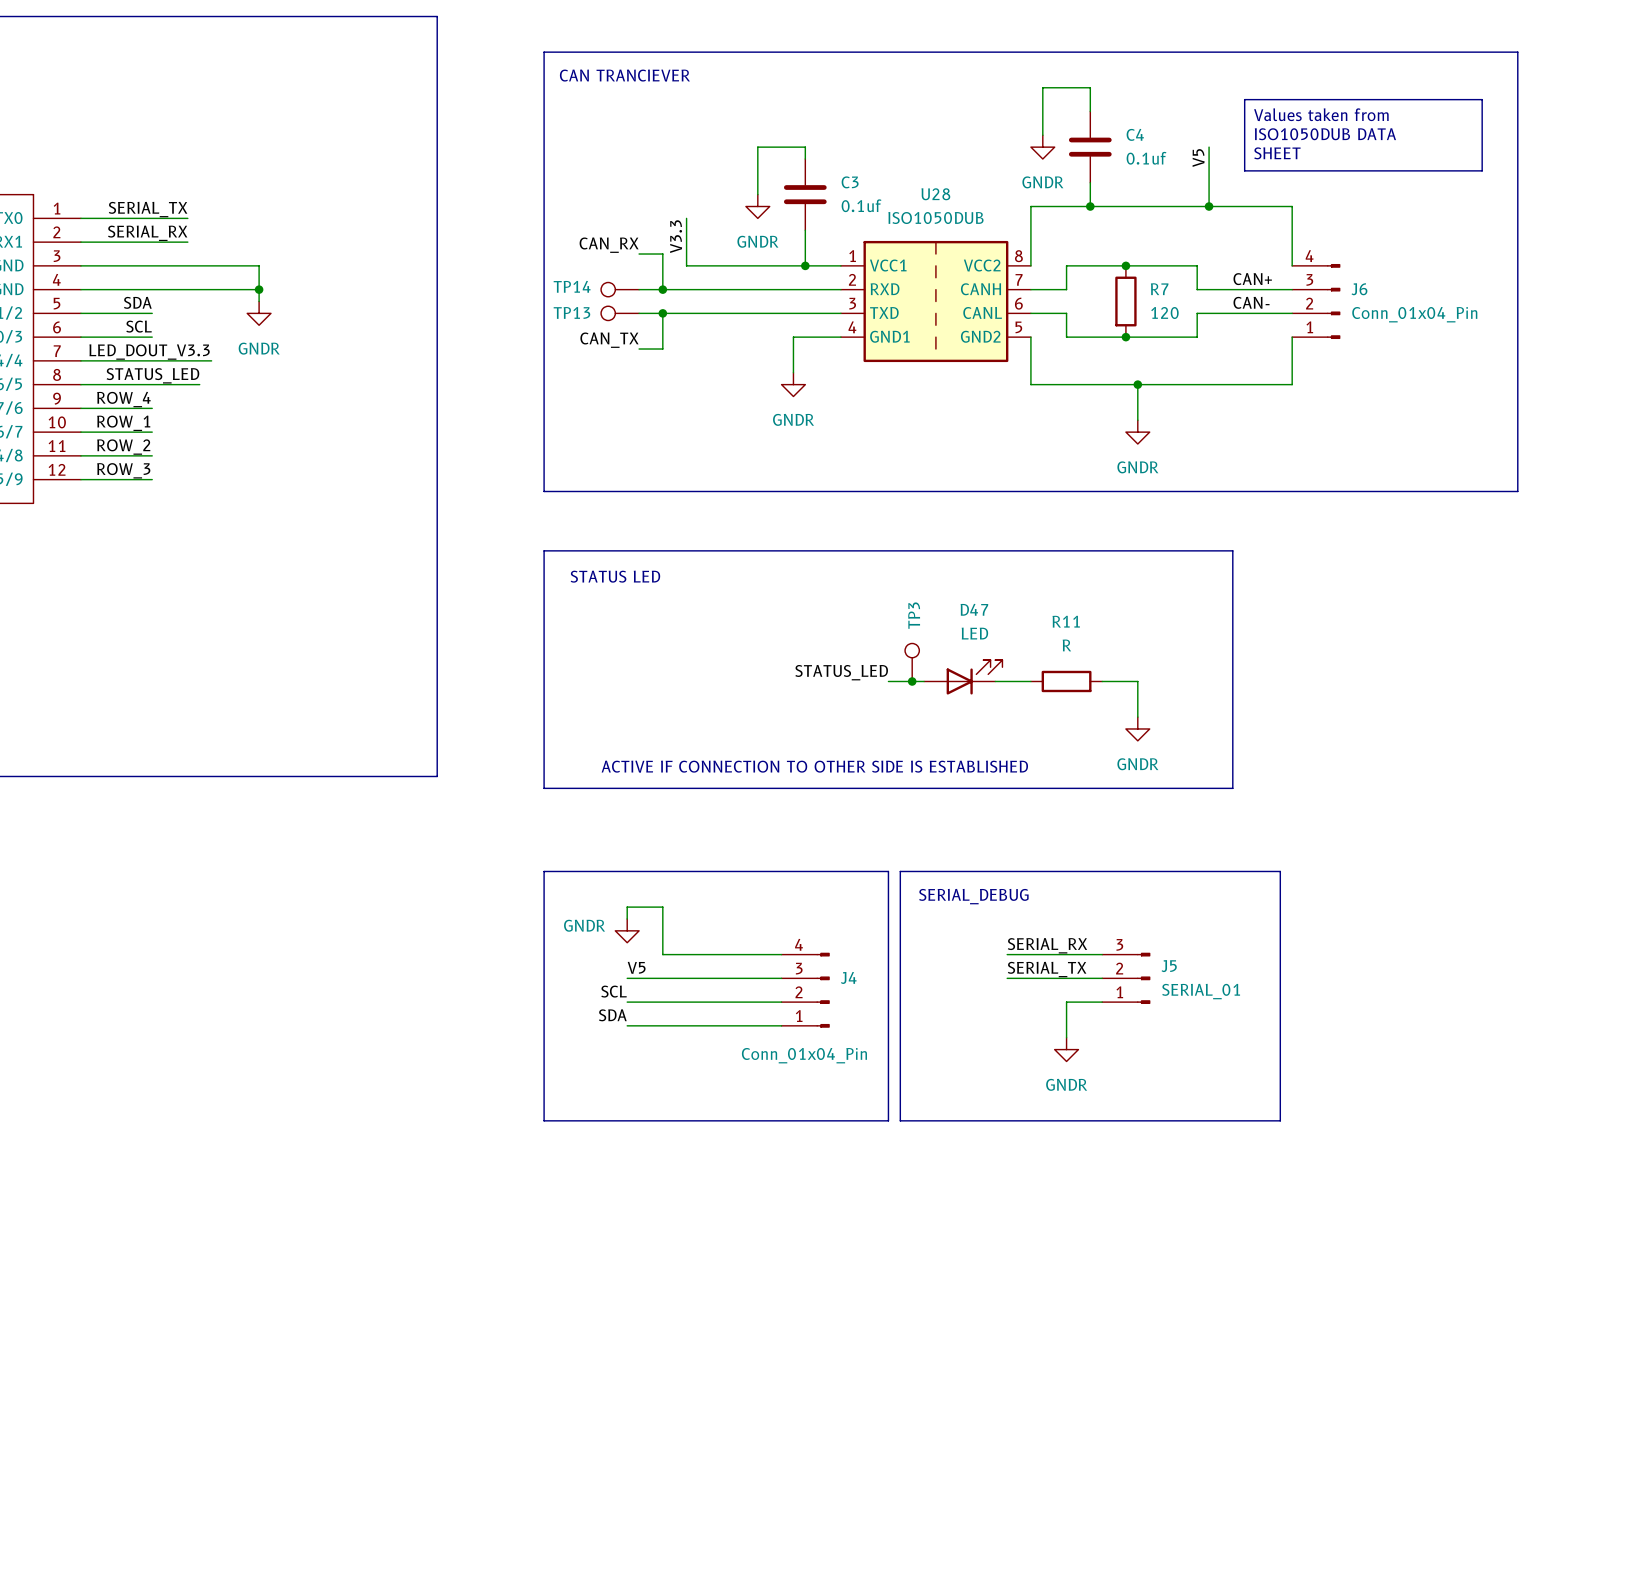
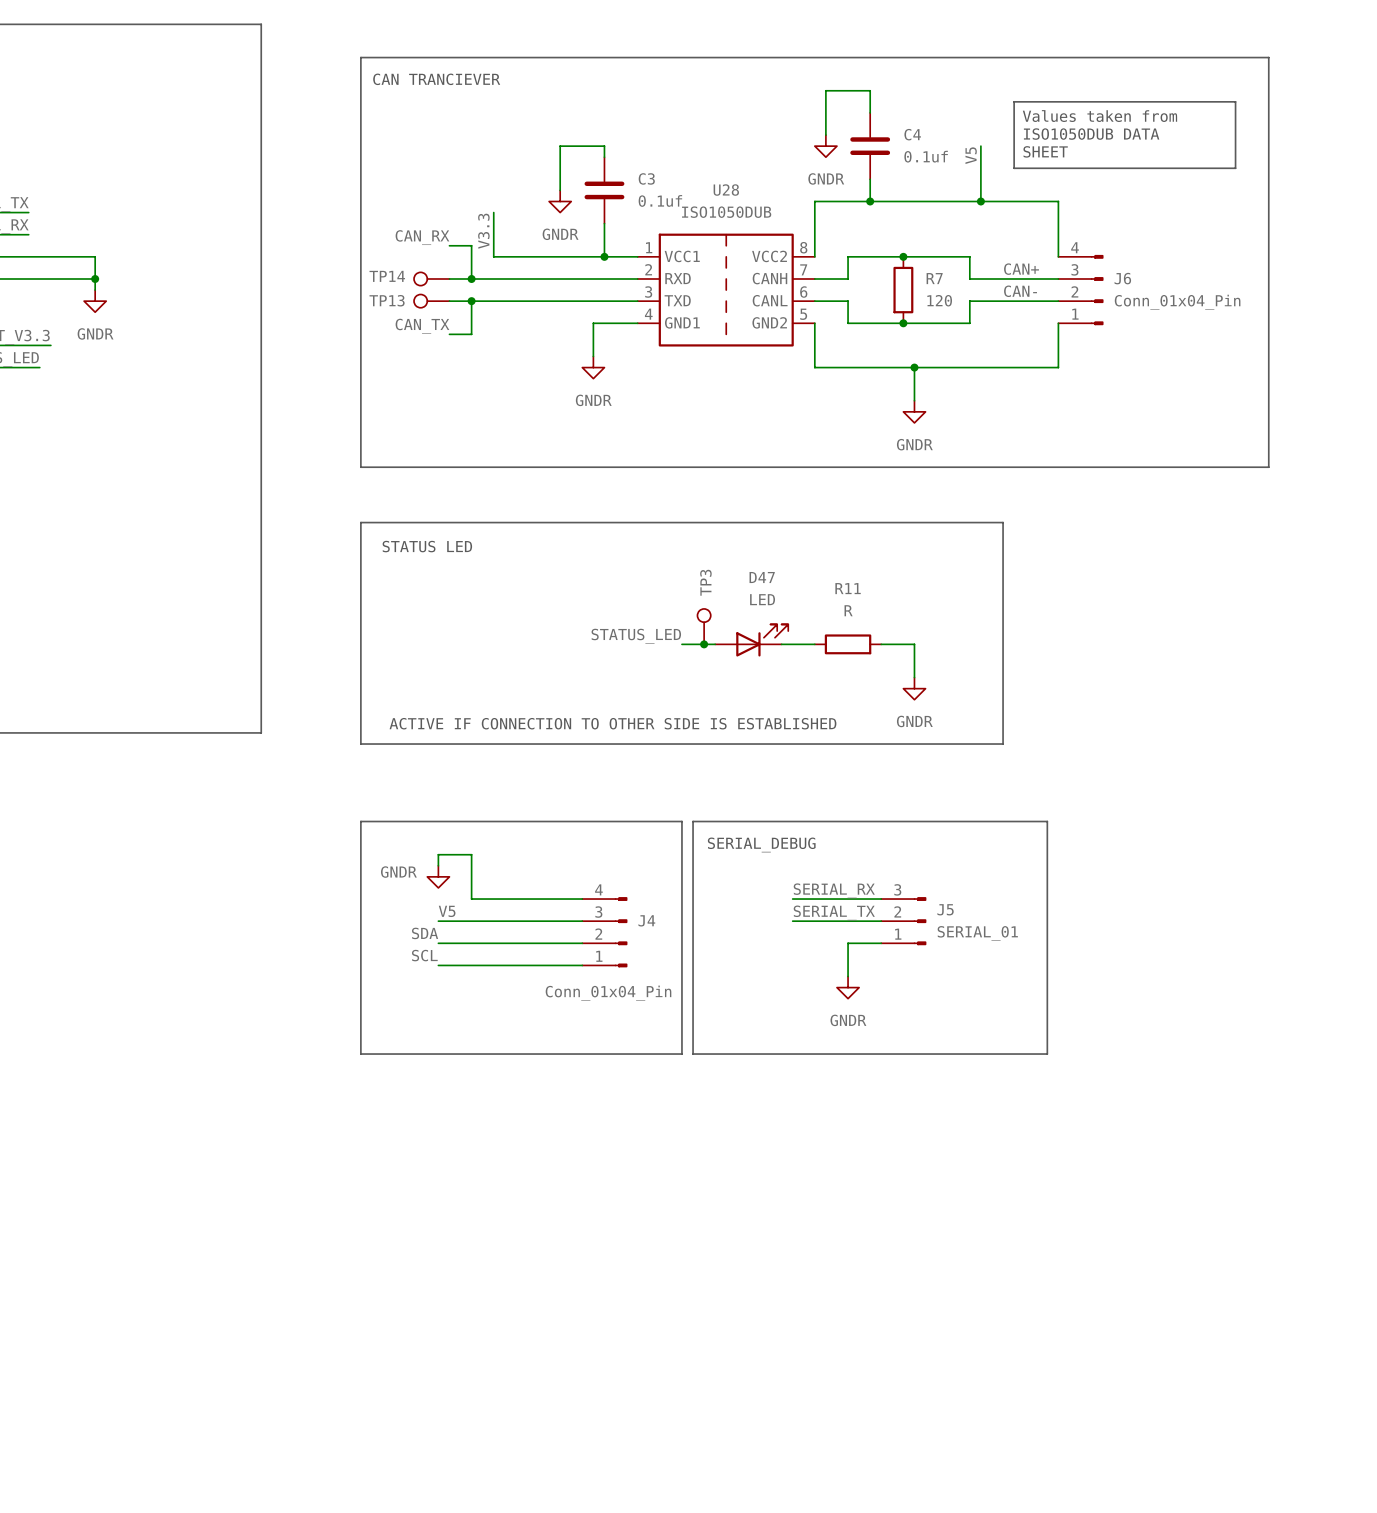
label: SCL (614, 991) -> SDA (425, 933)
label: SDA (612, 1015) -> SCL (424, 955)

